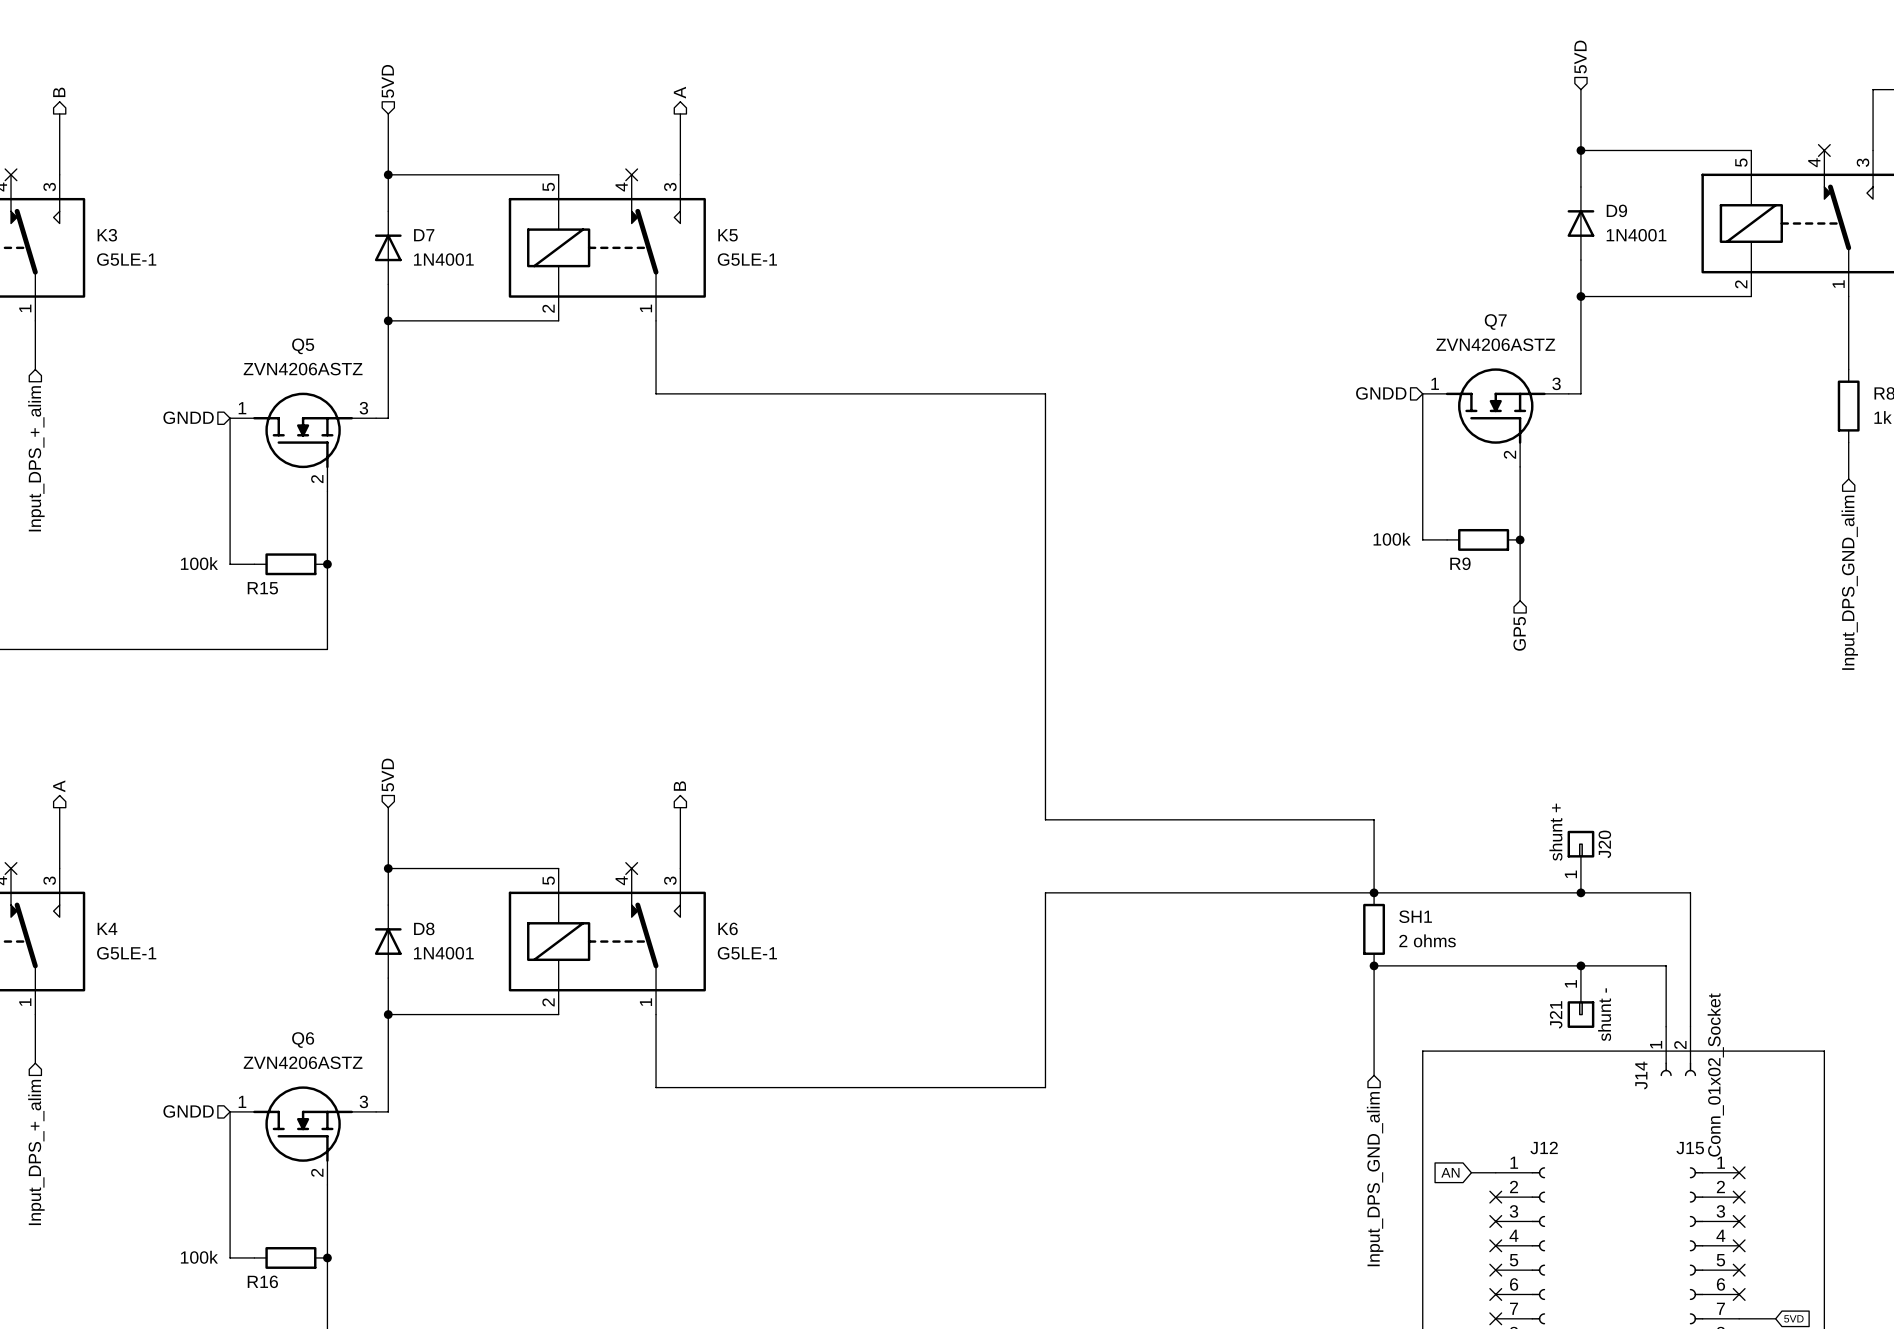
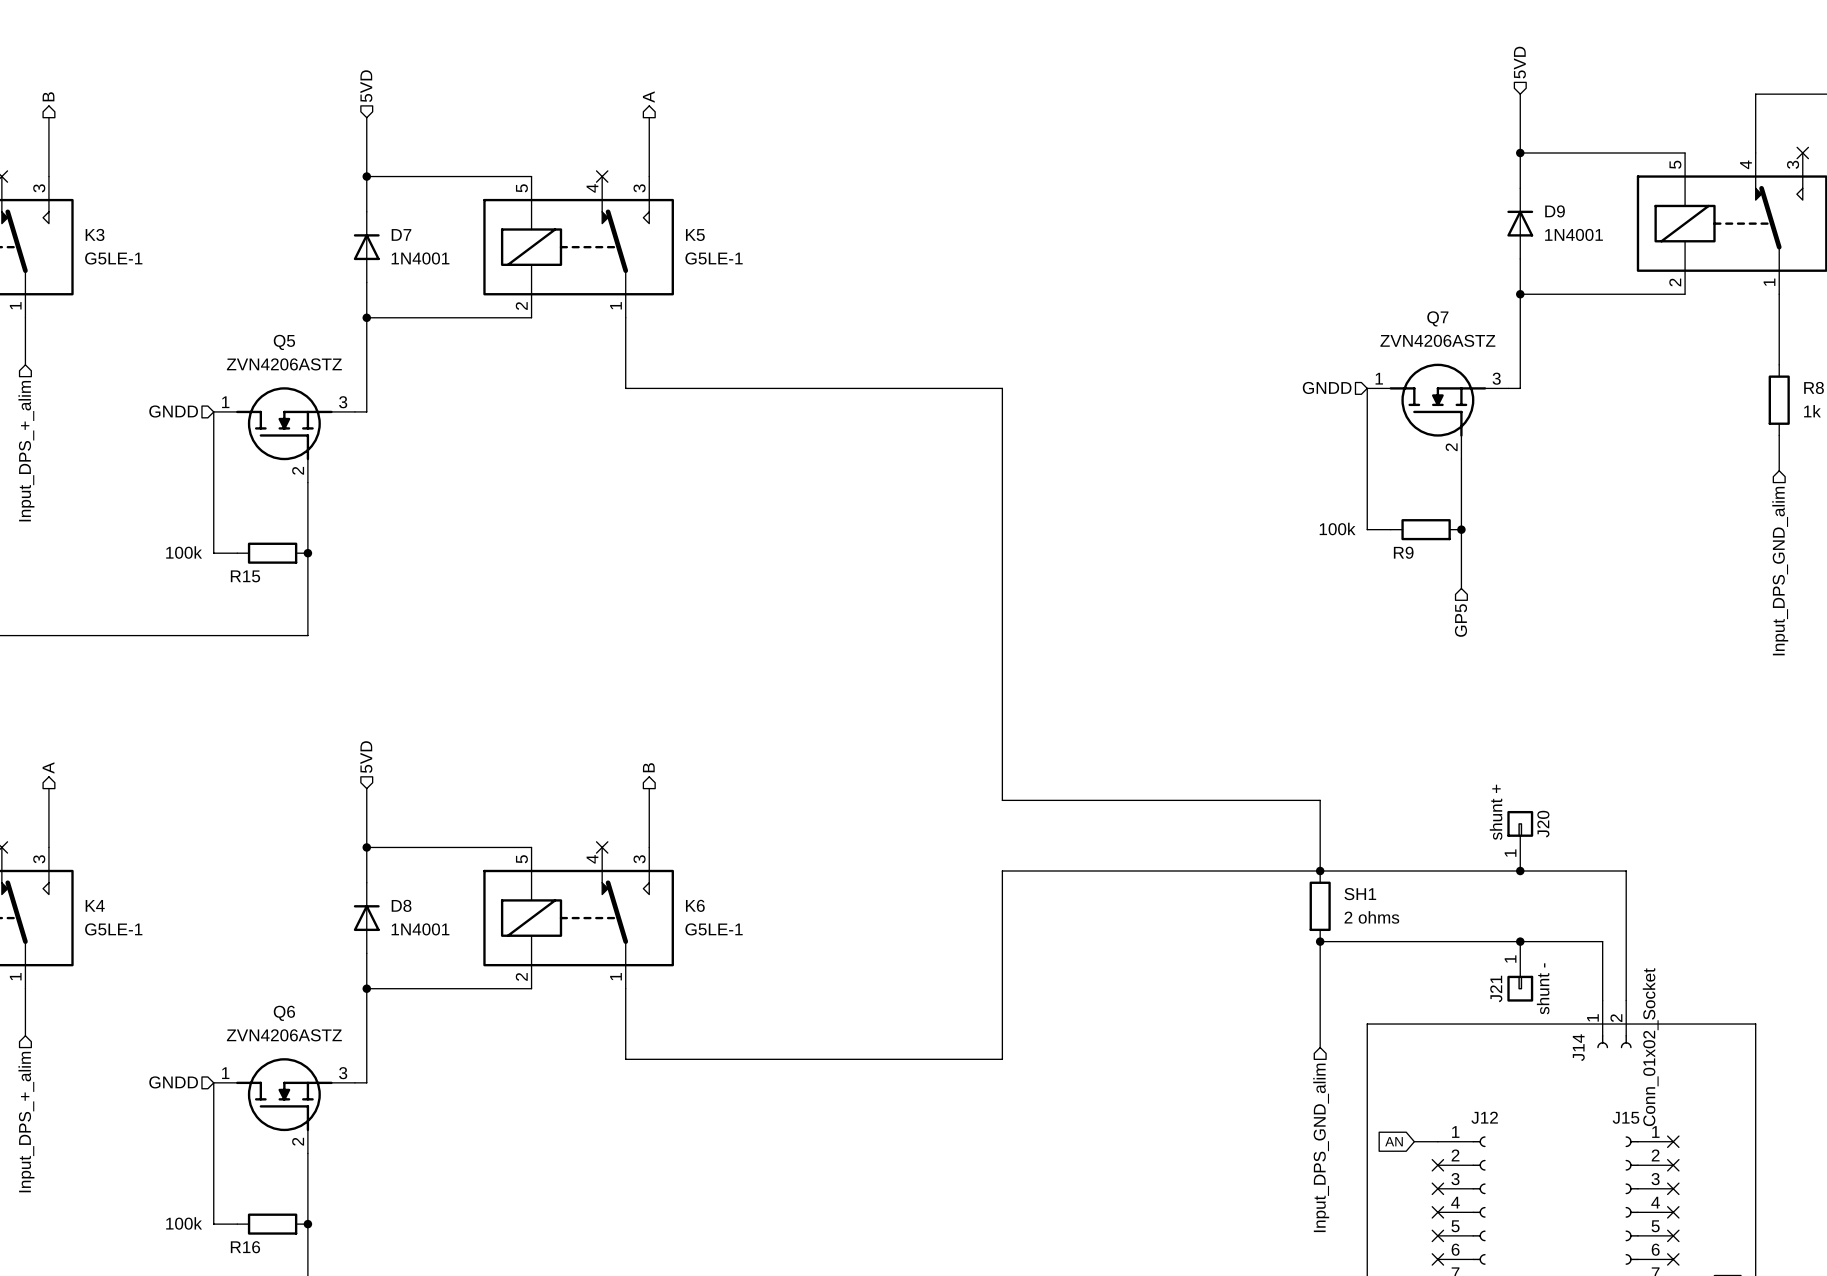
wire: (1873, 89) (1873, 150) -> (1802, 94) (1755, 94) (1755, 152)
no-connect mark position: (1824, 150) -> (1802, 152)

